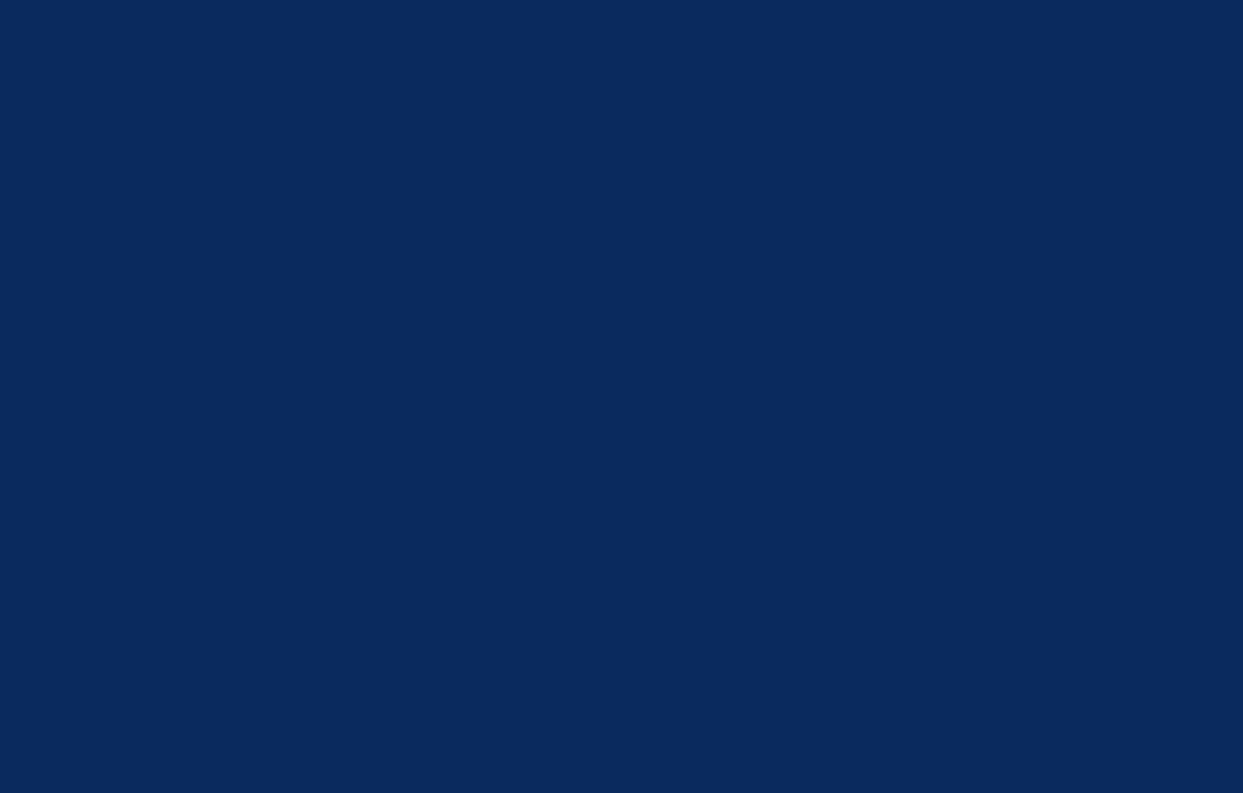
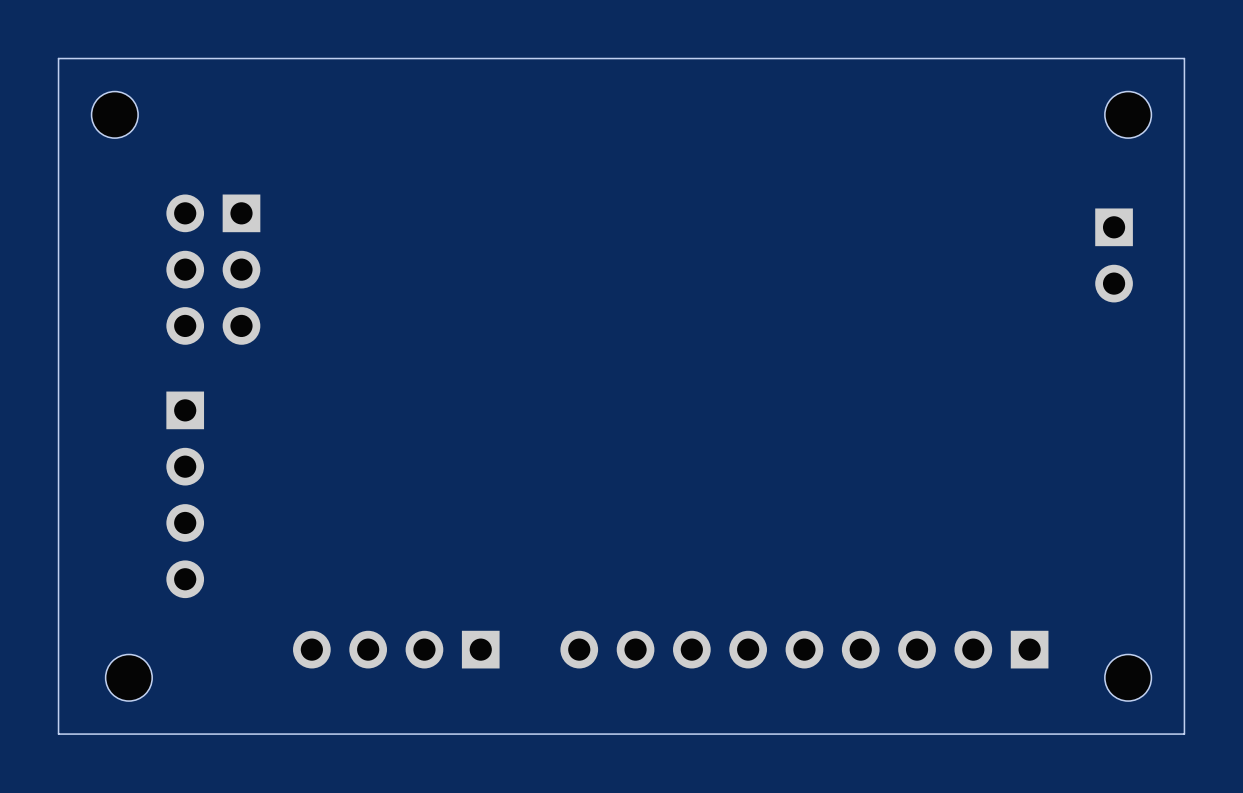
board edge: none -> (1184, 58) (58, 58) (58, 734) (1184, 734) (1184, 58)
part: none -> (114, 114)
part: none -> (1128, 114)
part: none -> (1114, 255)
part: none -> (213, 269)
part: none -> (185, 494)
part: none -> (396, 649)
part: none -> (804, 649)
part: none -> (128, 677)
part: none -> (1128, 677)

